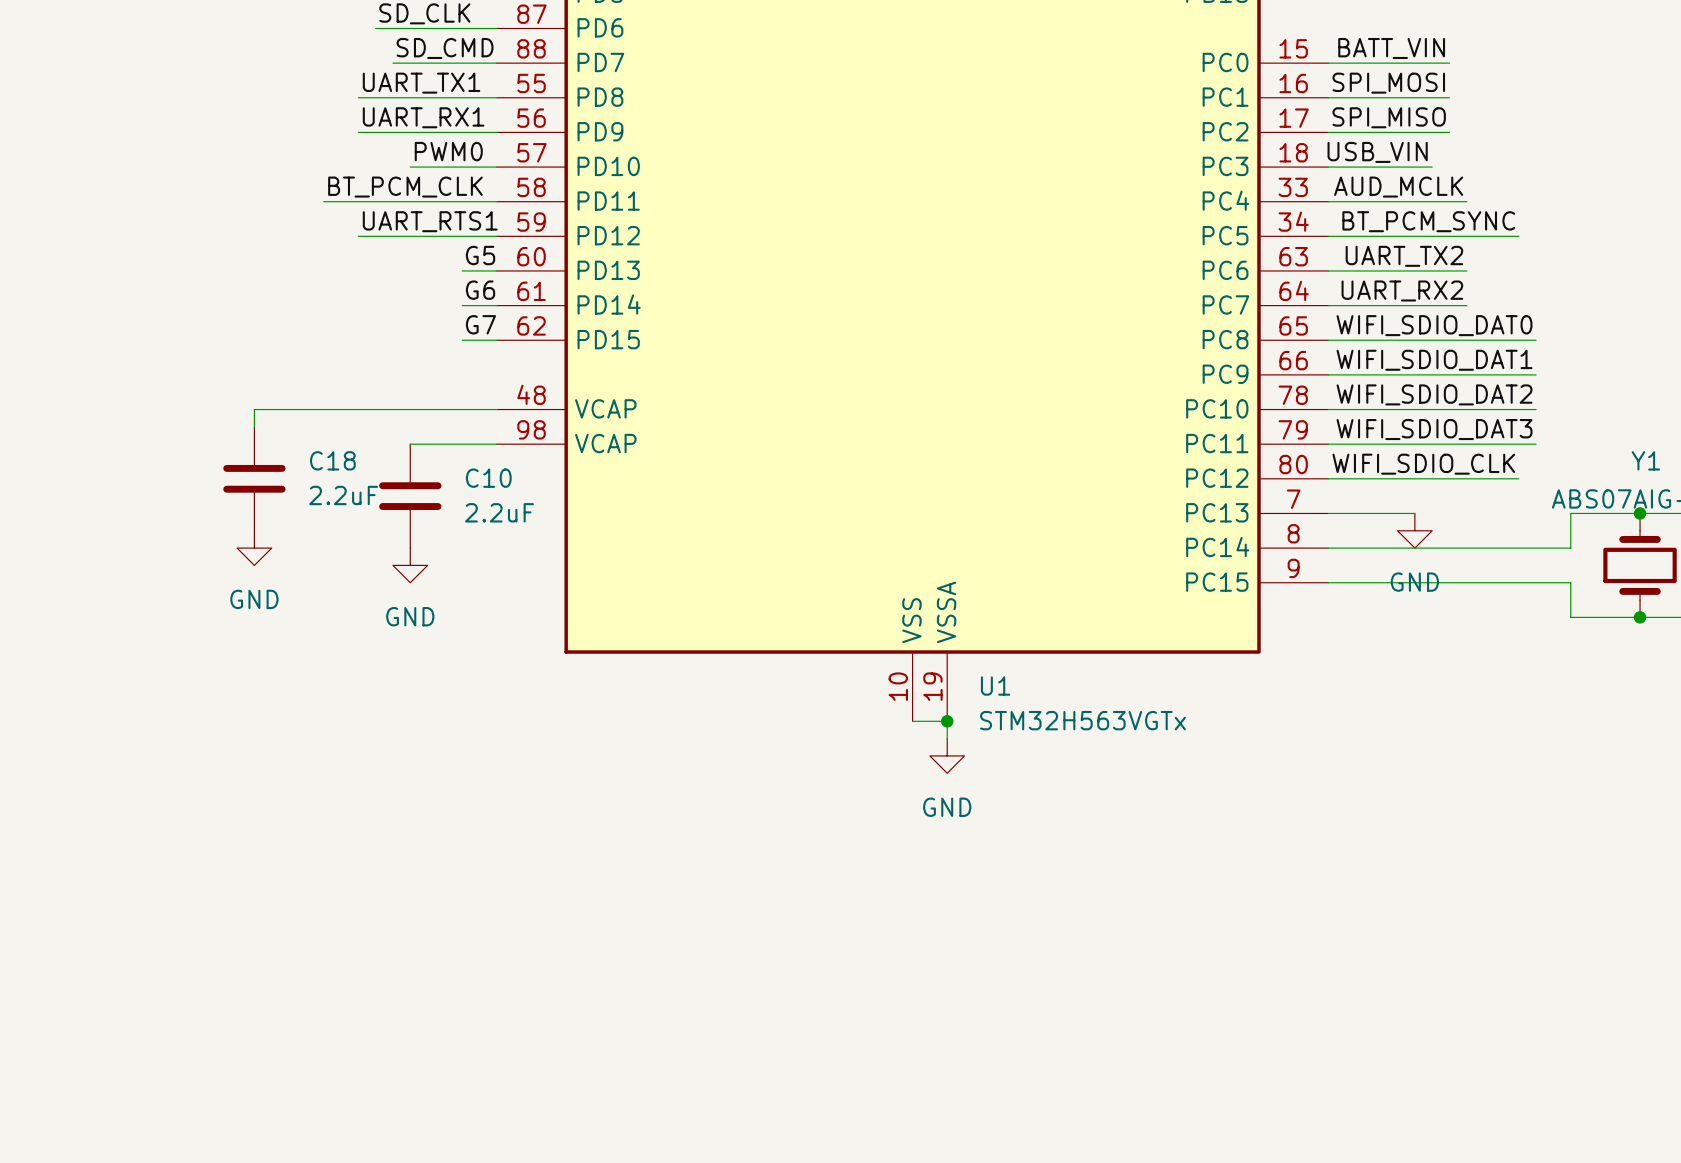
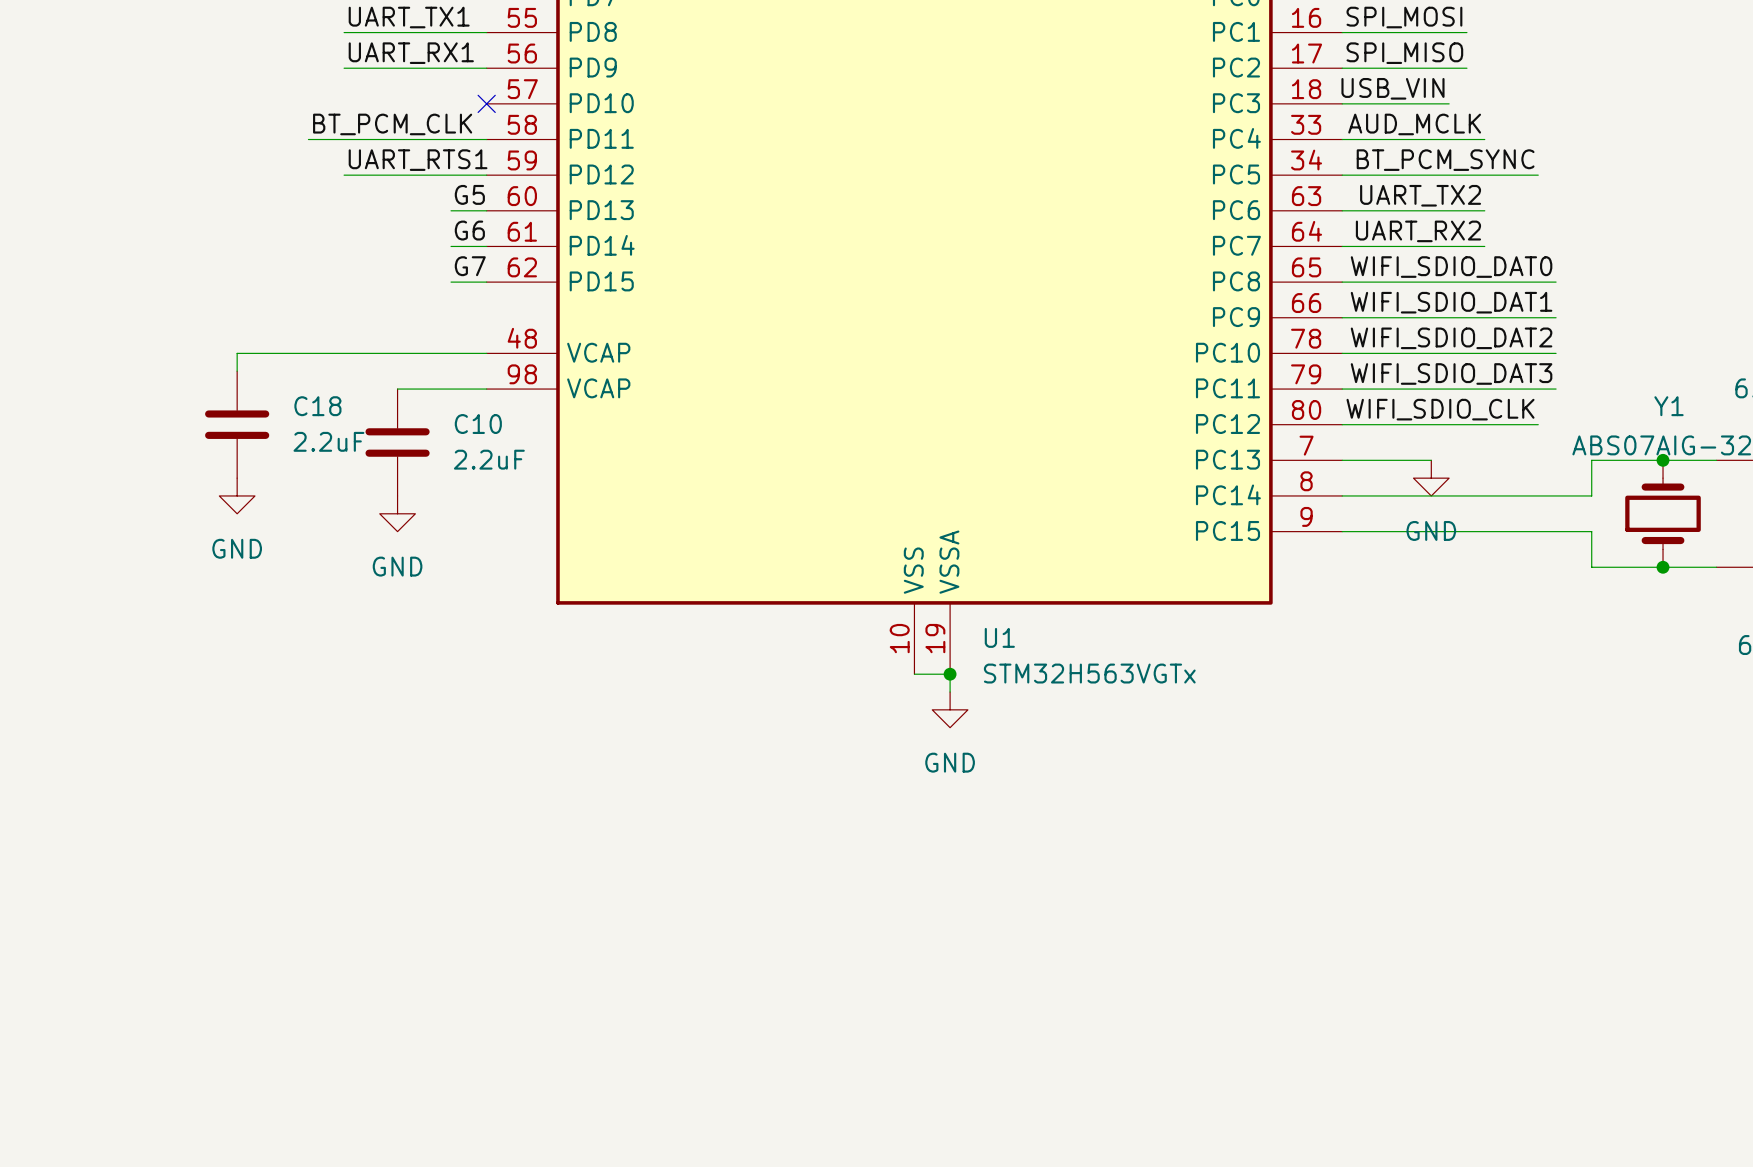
label: PWM0 (448, 151) -> none
wire: (410, 167) (496, 167) -> none
no-connect mark: none -> (486, 103)

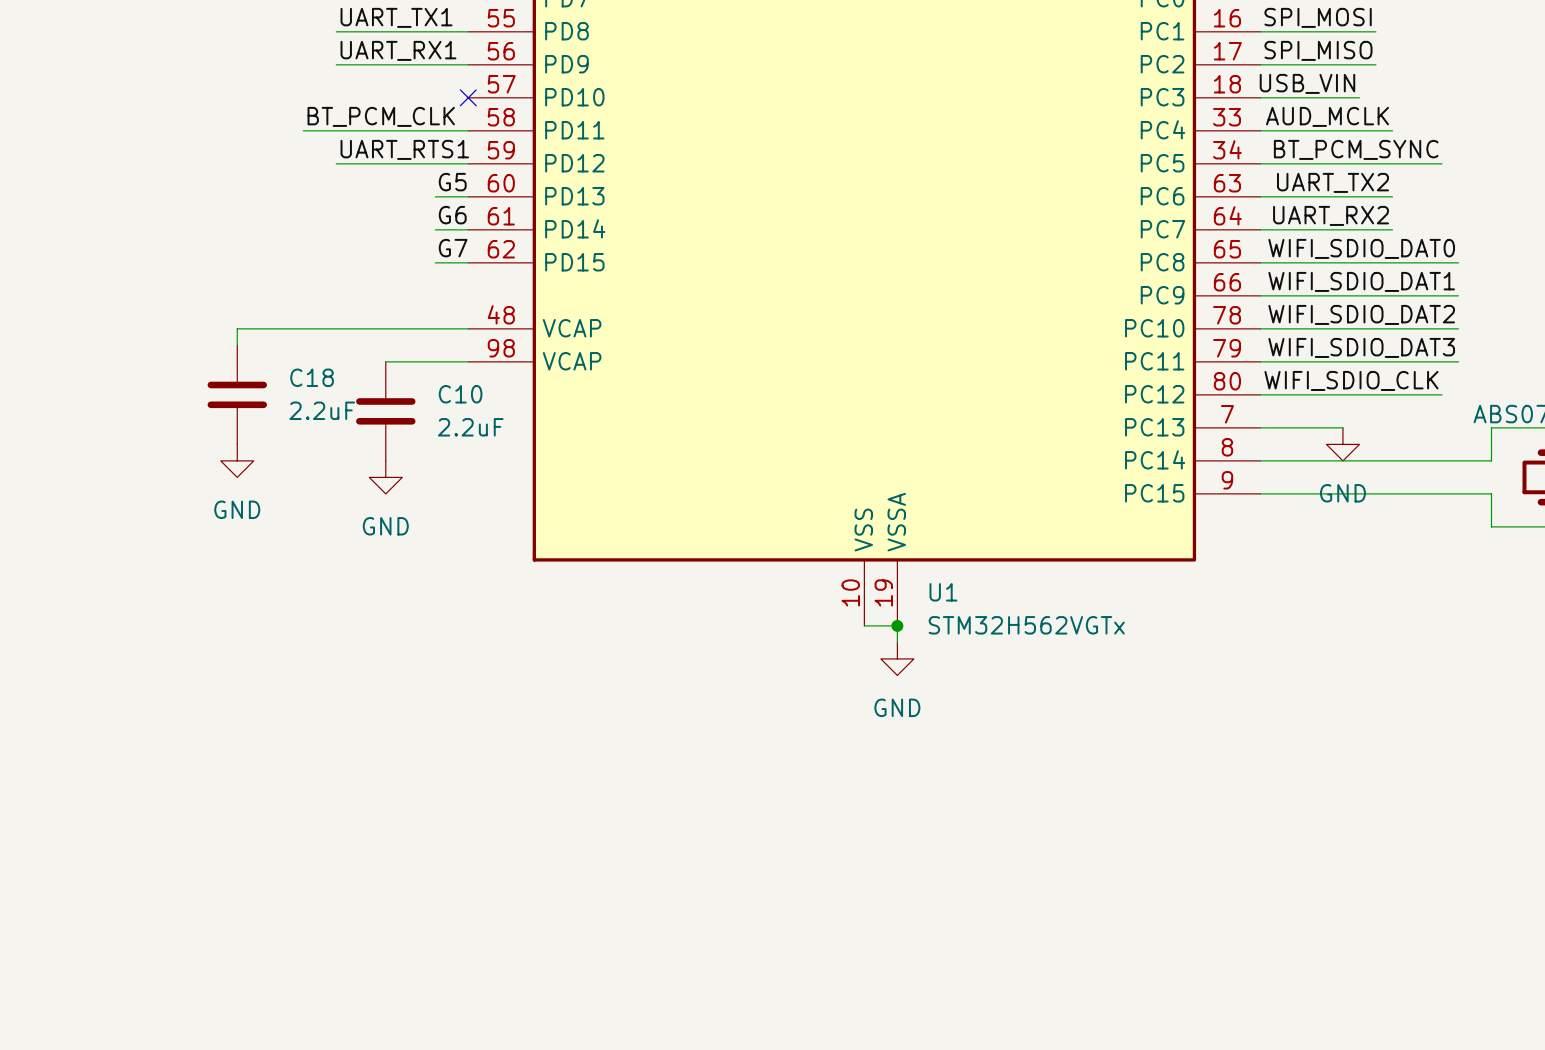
U1 value: STM32H563VGTx (1089, 673) -> STM32H562VGTx (1026, 625)

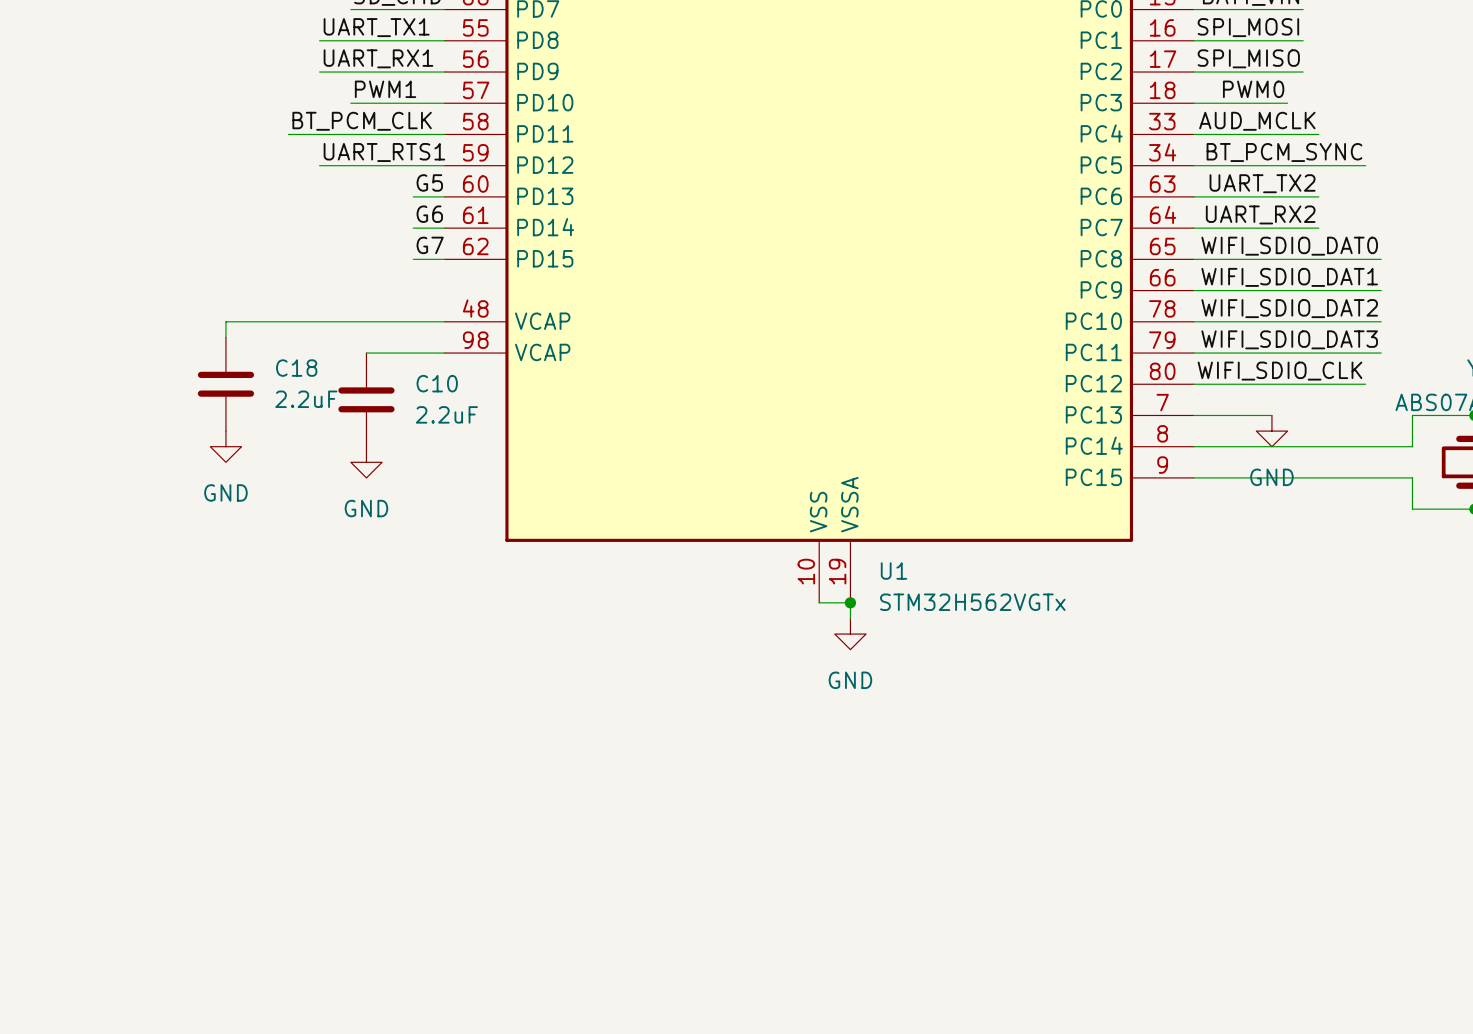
label: none -> PWM1 (385, 89)
label: USB_VIN (1307, 83) -> PWM0 (1253, 89)
wire: none -> (350, 103) (444, 103)
no-connect mark: (468, 97) -> none

